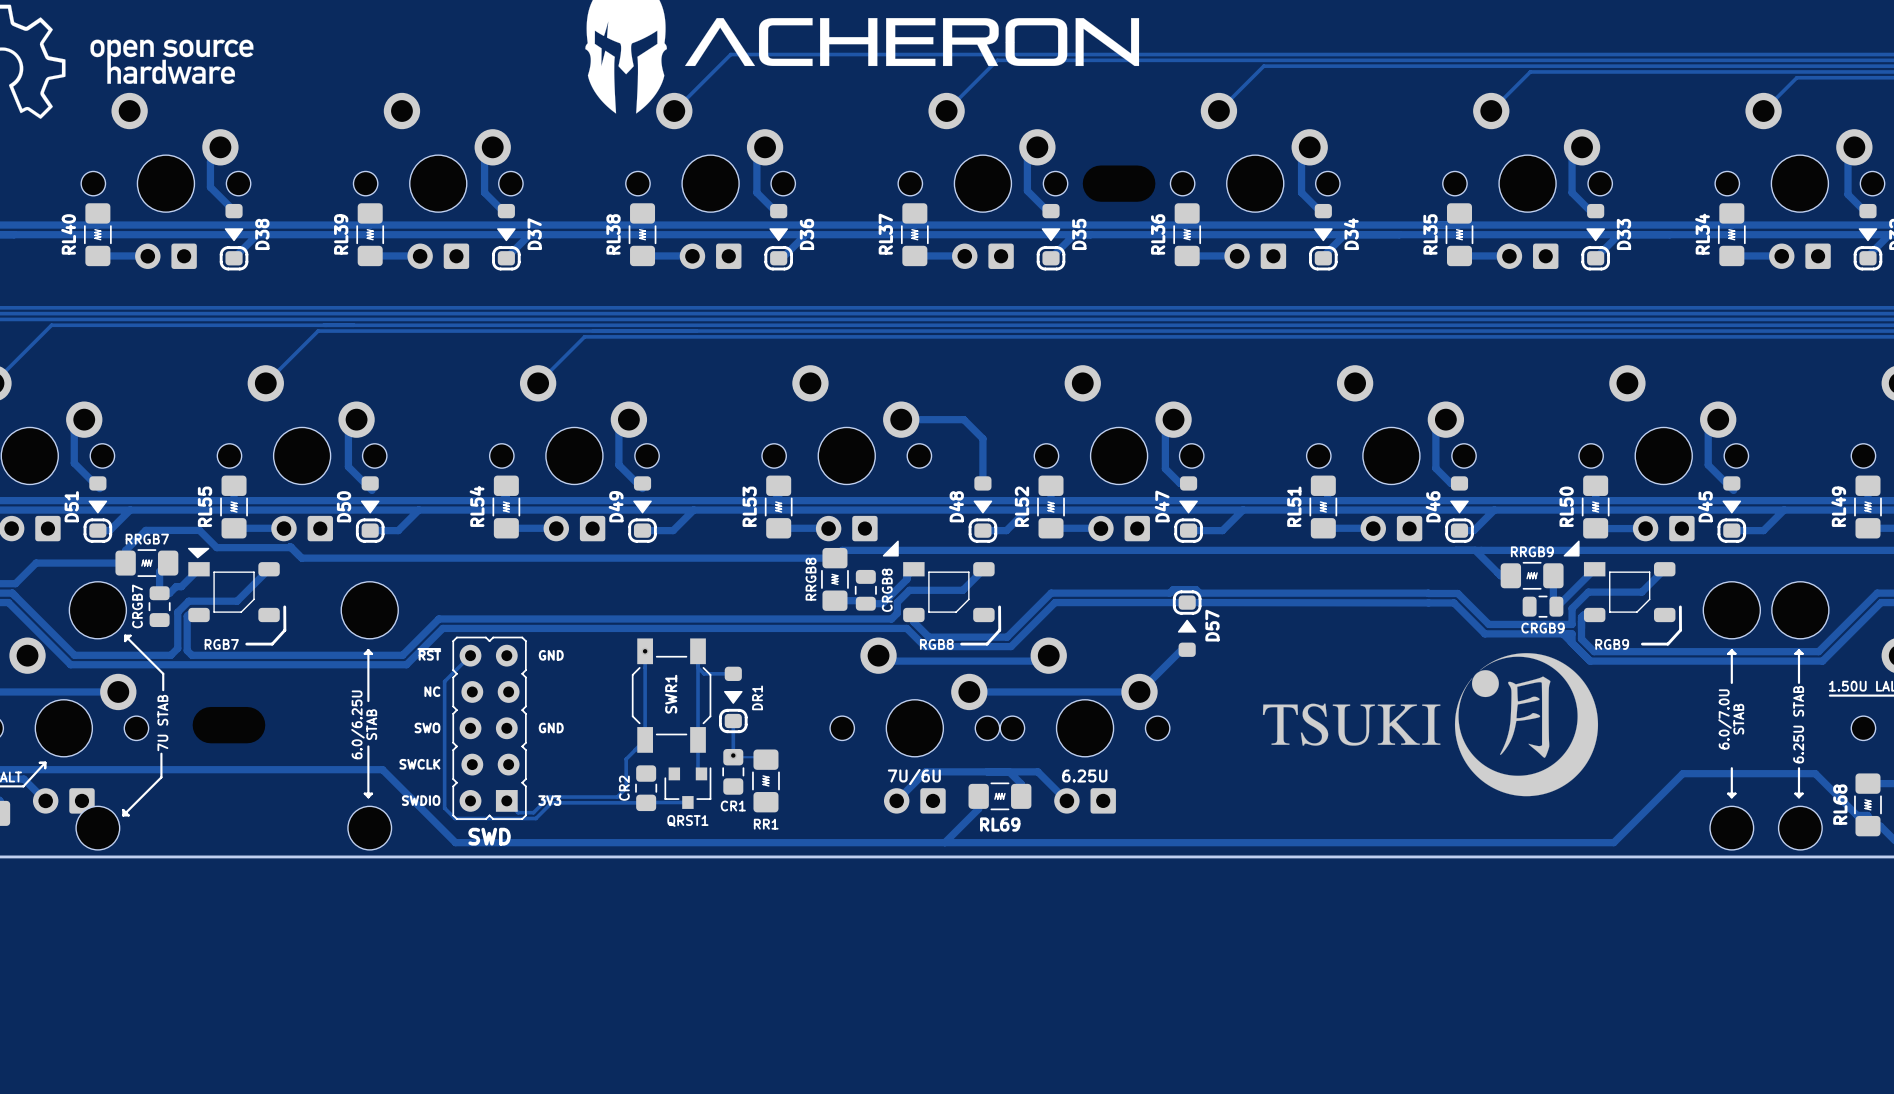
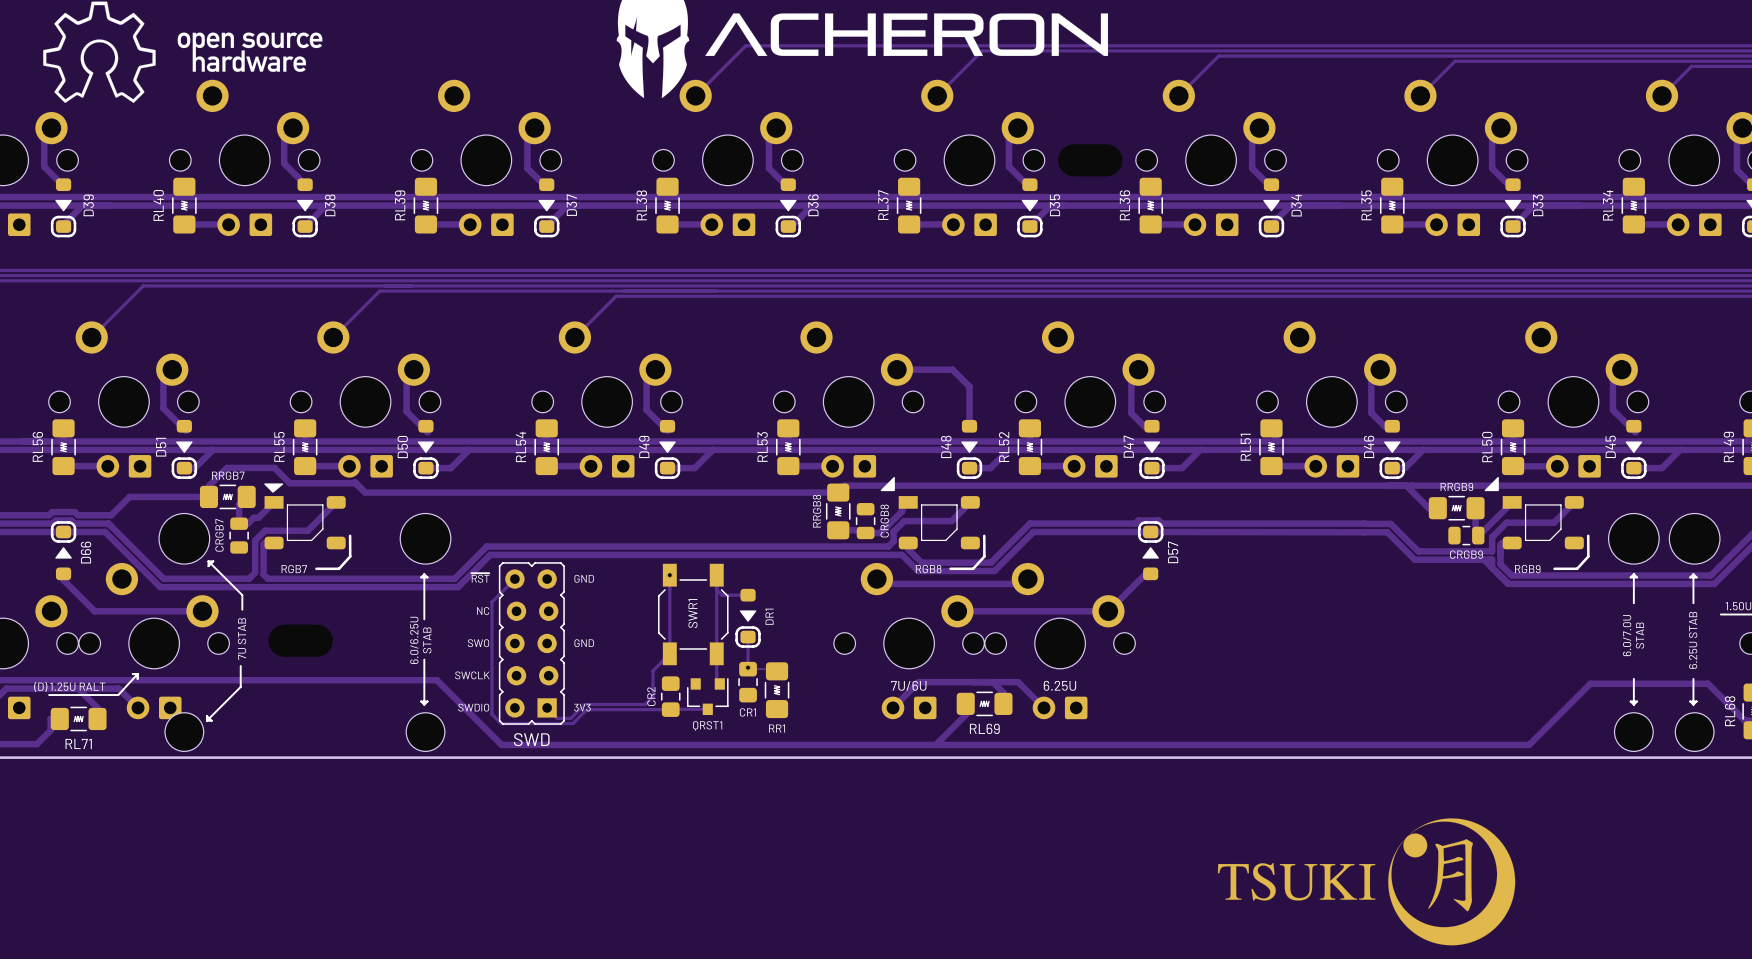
part position: (1430, 724) -> (1366, 881)

